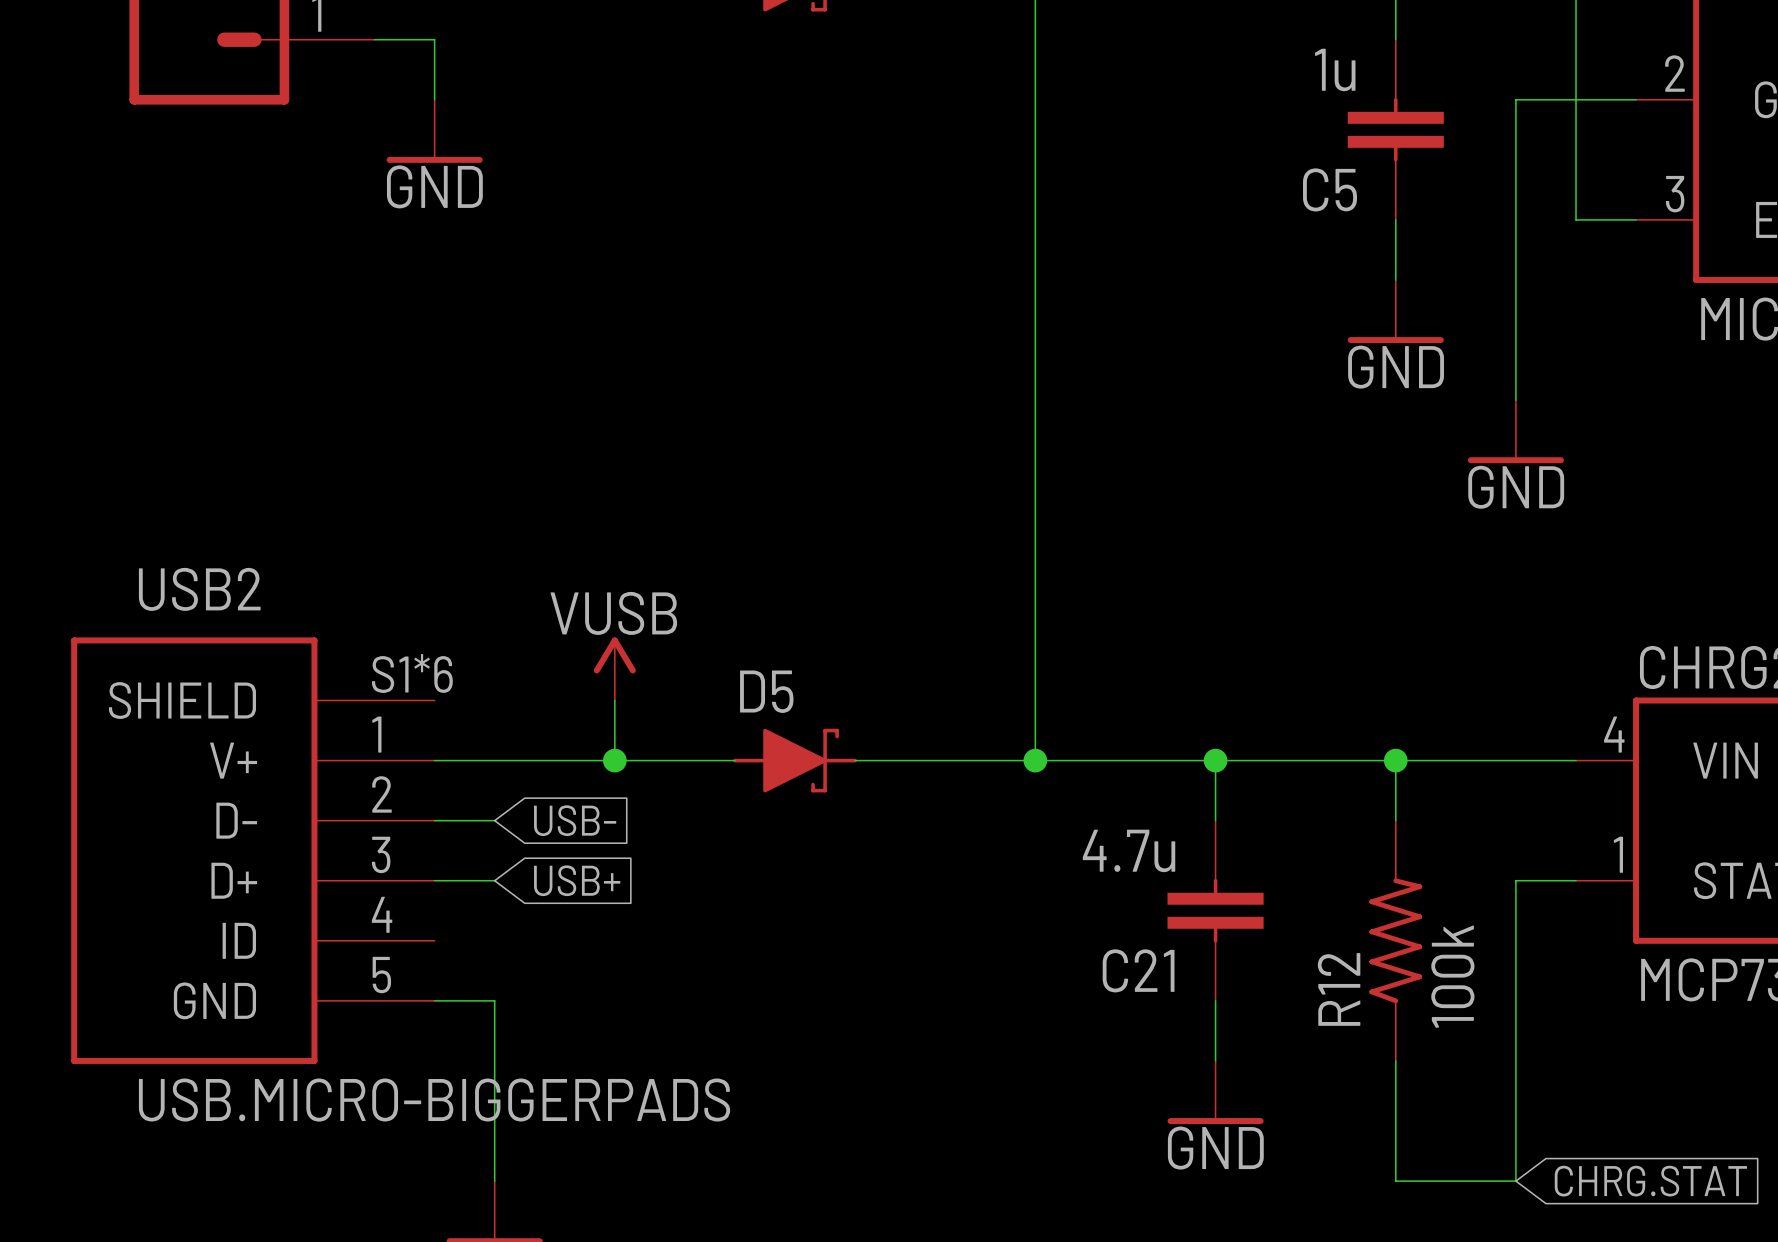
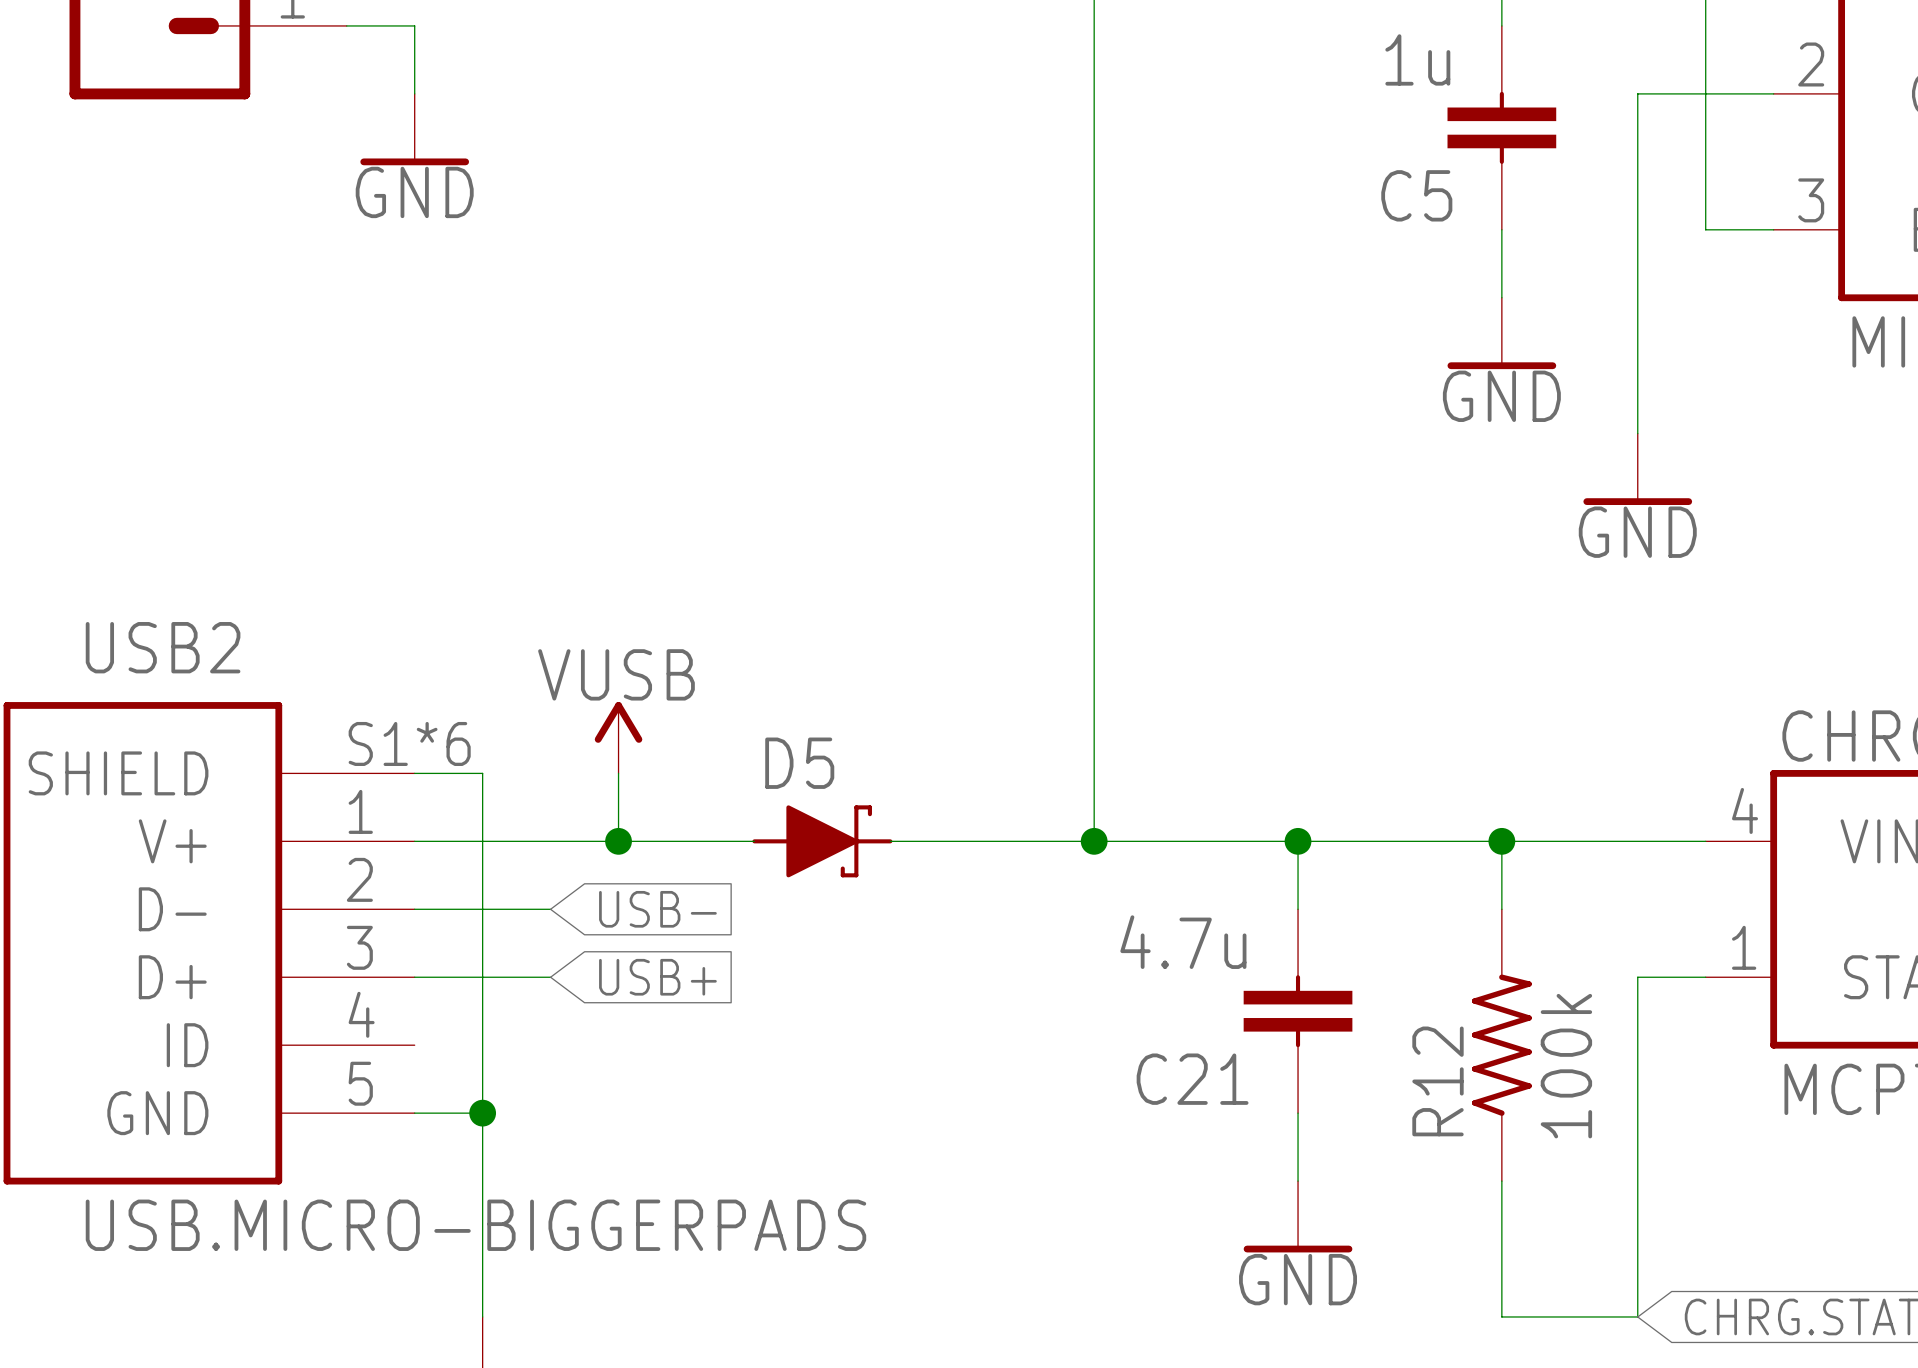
wire: none -> (414, 773) (482, 773) (482, 1113)
wire: none -> (482, 909) (550, 909)
global label position: USB- (575, 820) -> USB- (657, 909)
wire: none -> (482, 977) (550, 977)
global label position: USB+ (577, 880) -> USB+ (657, 977)
junction: none -> (482, 1113)

